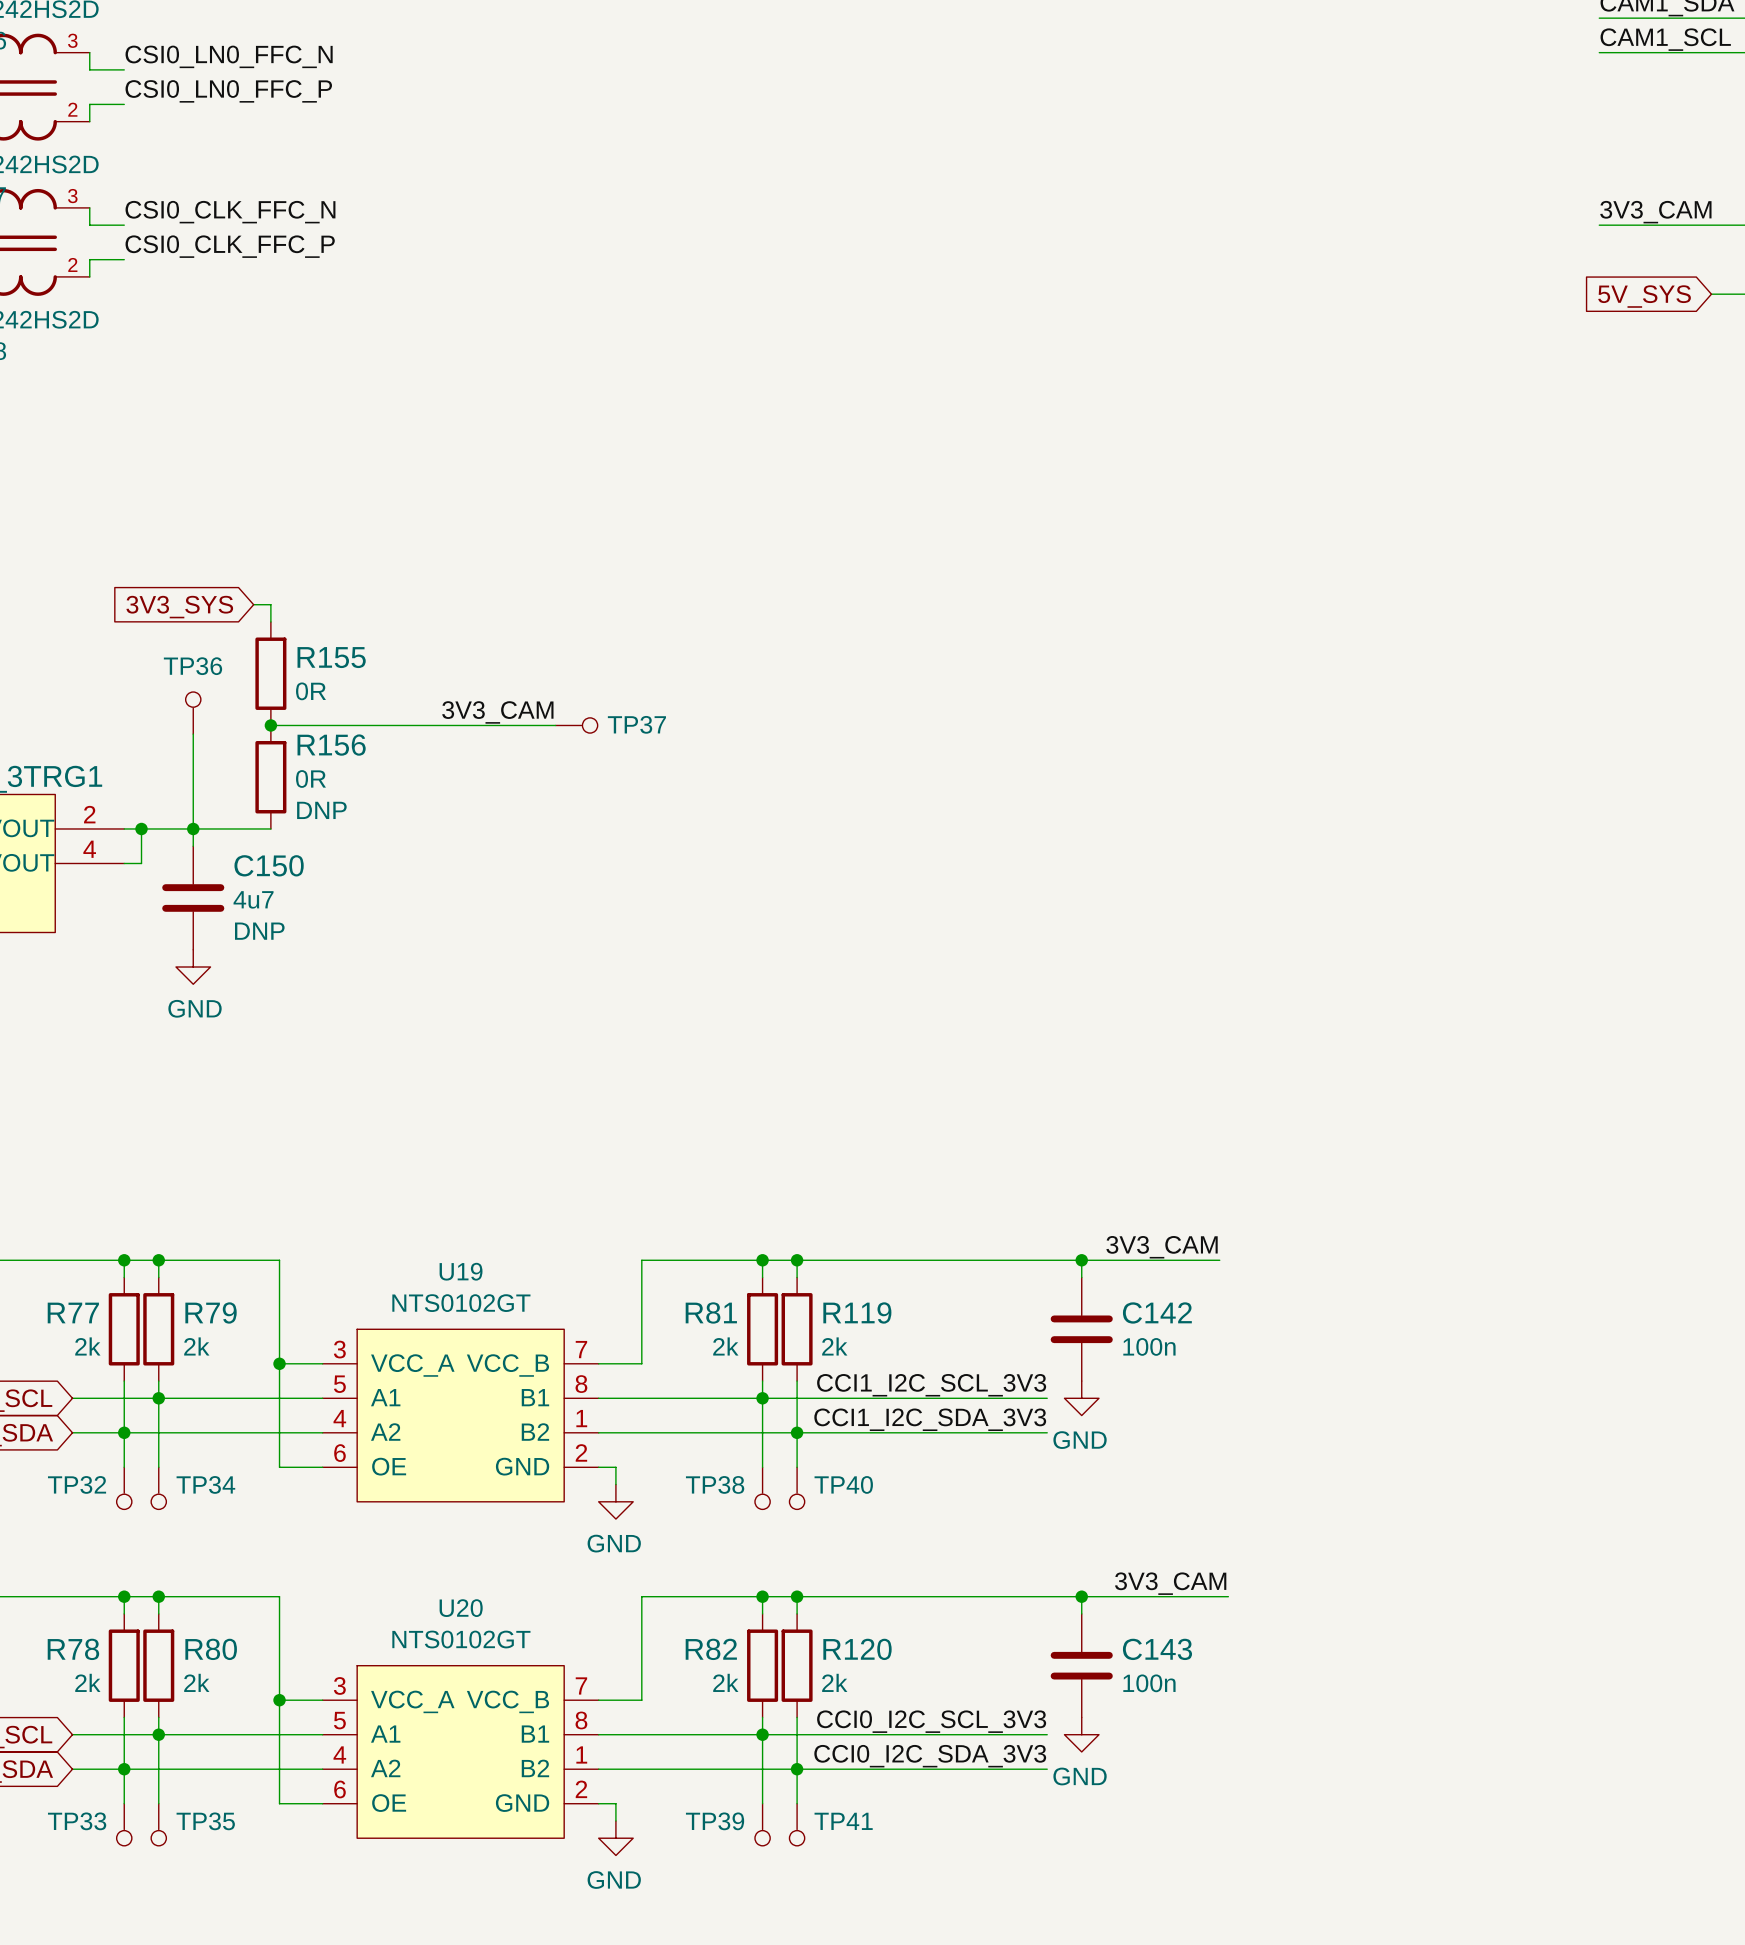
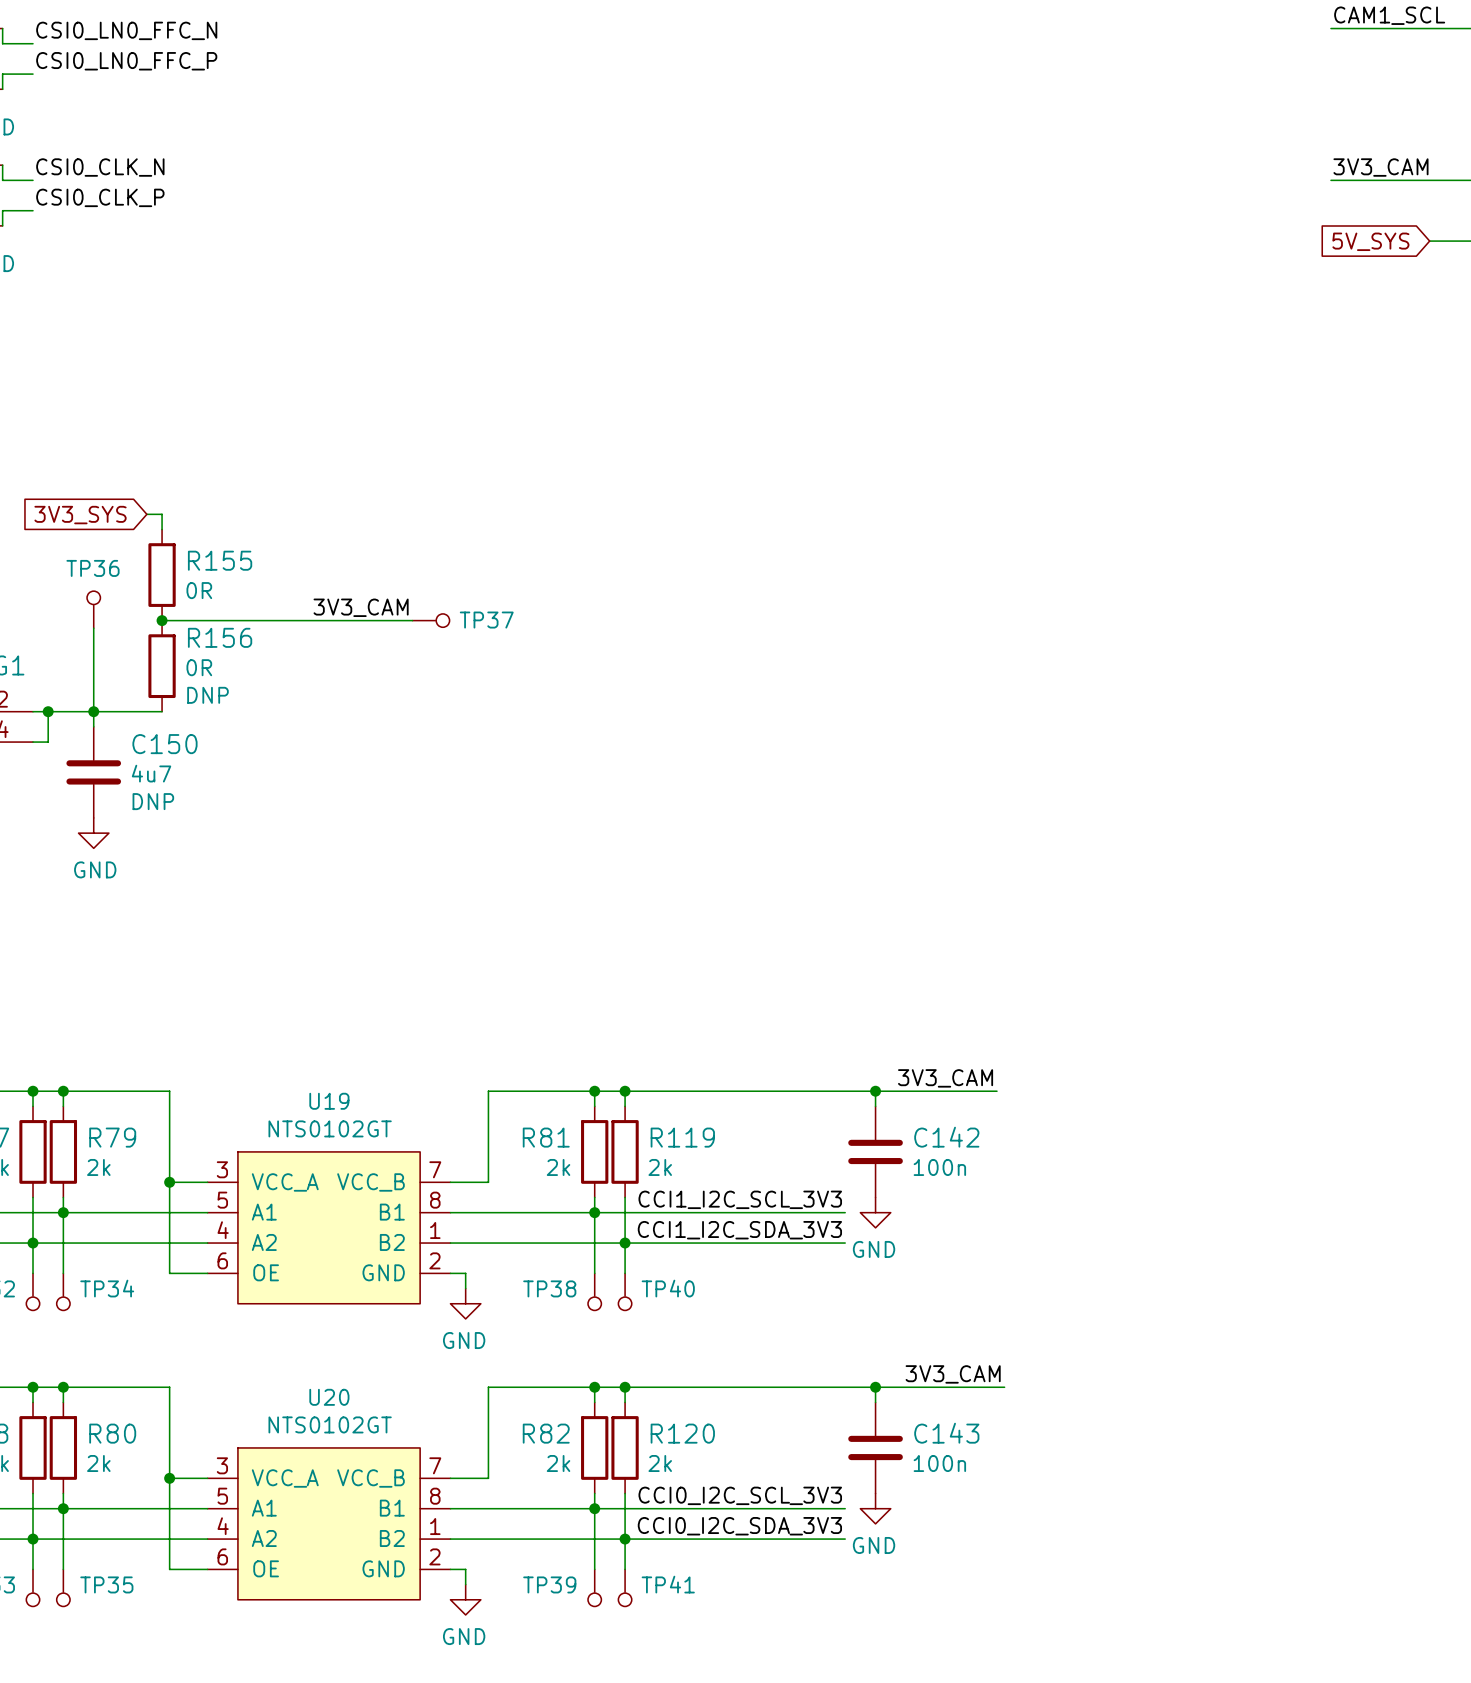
label: CSI0_CLK_FFC_N (230, 212) -> CSI0_CLK_N (100, 167)
label: CSI0_CLK_FFC_P (230, 246) -> CSI0_CLK_P (100, 197)

